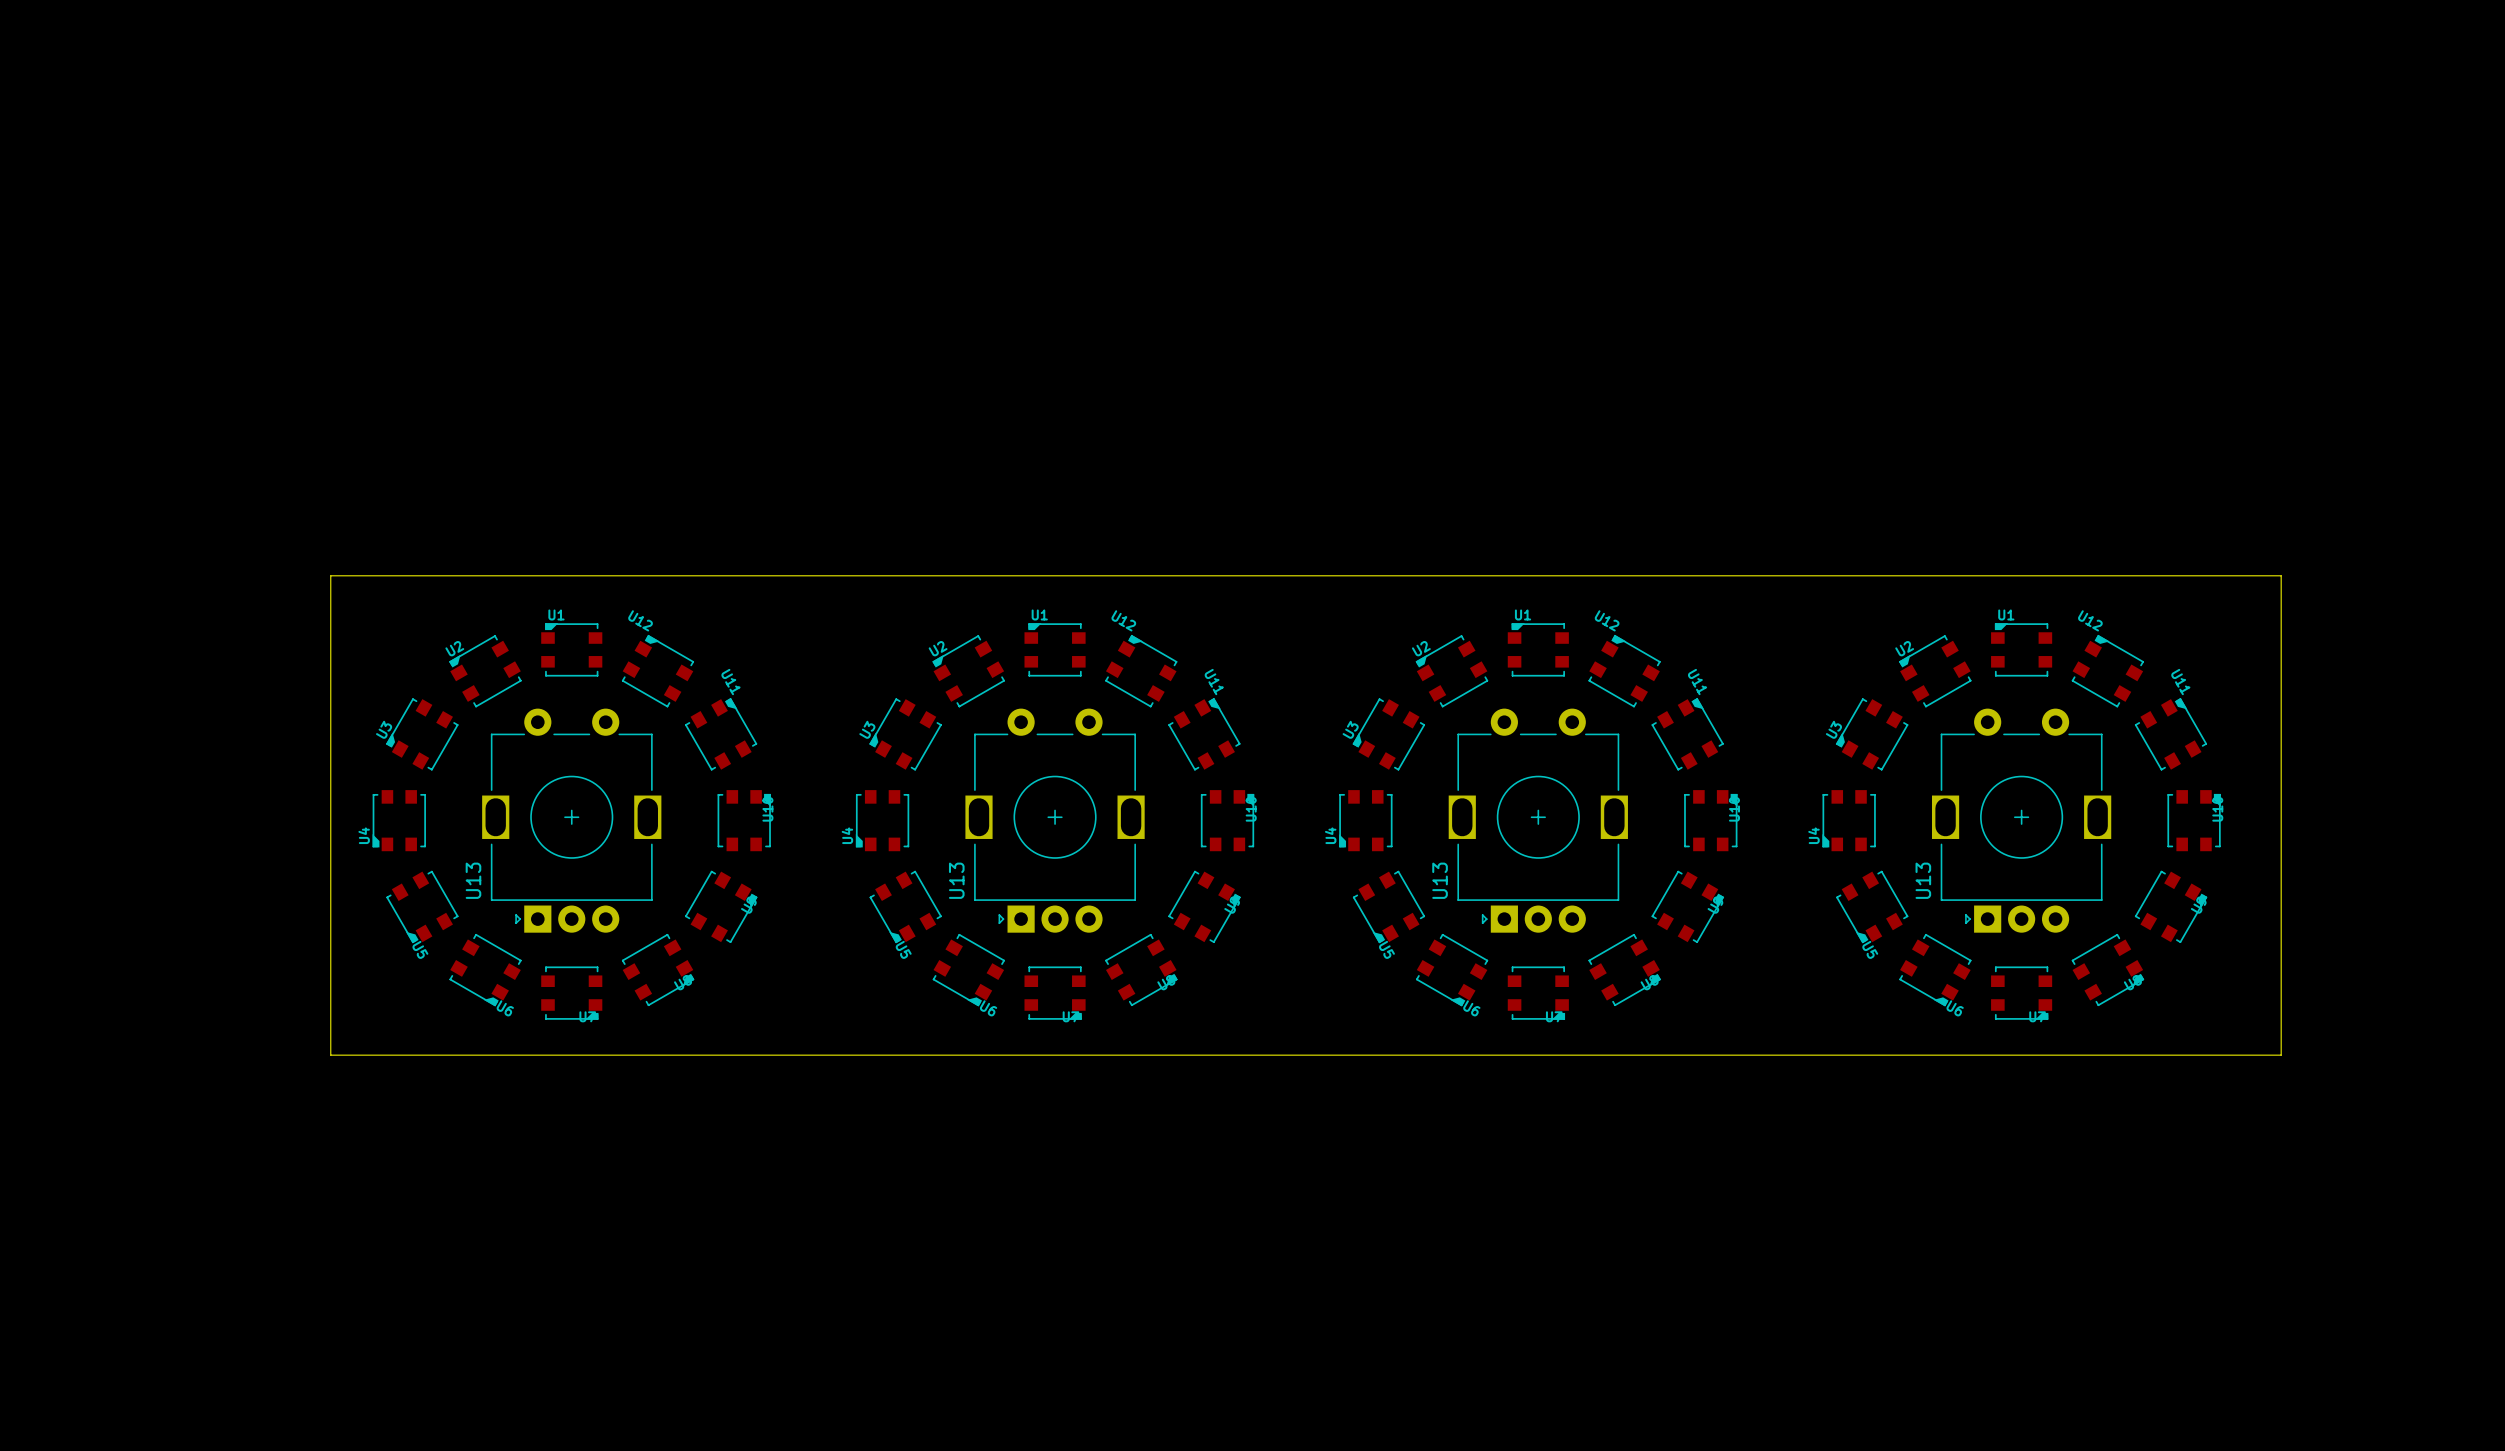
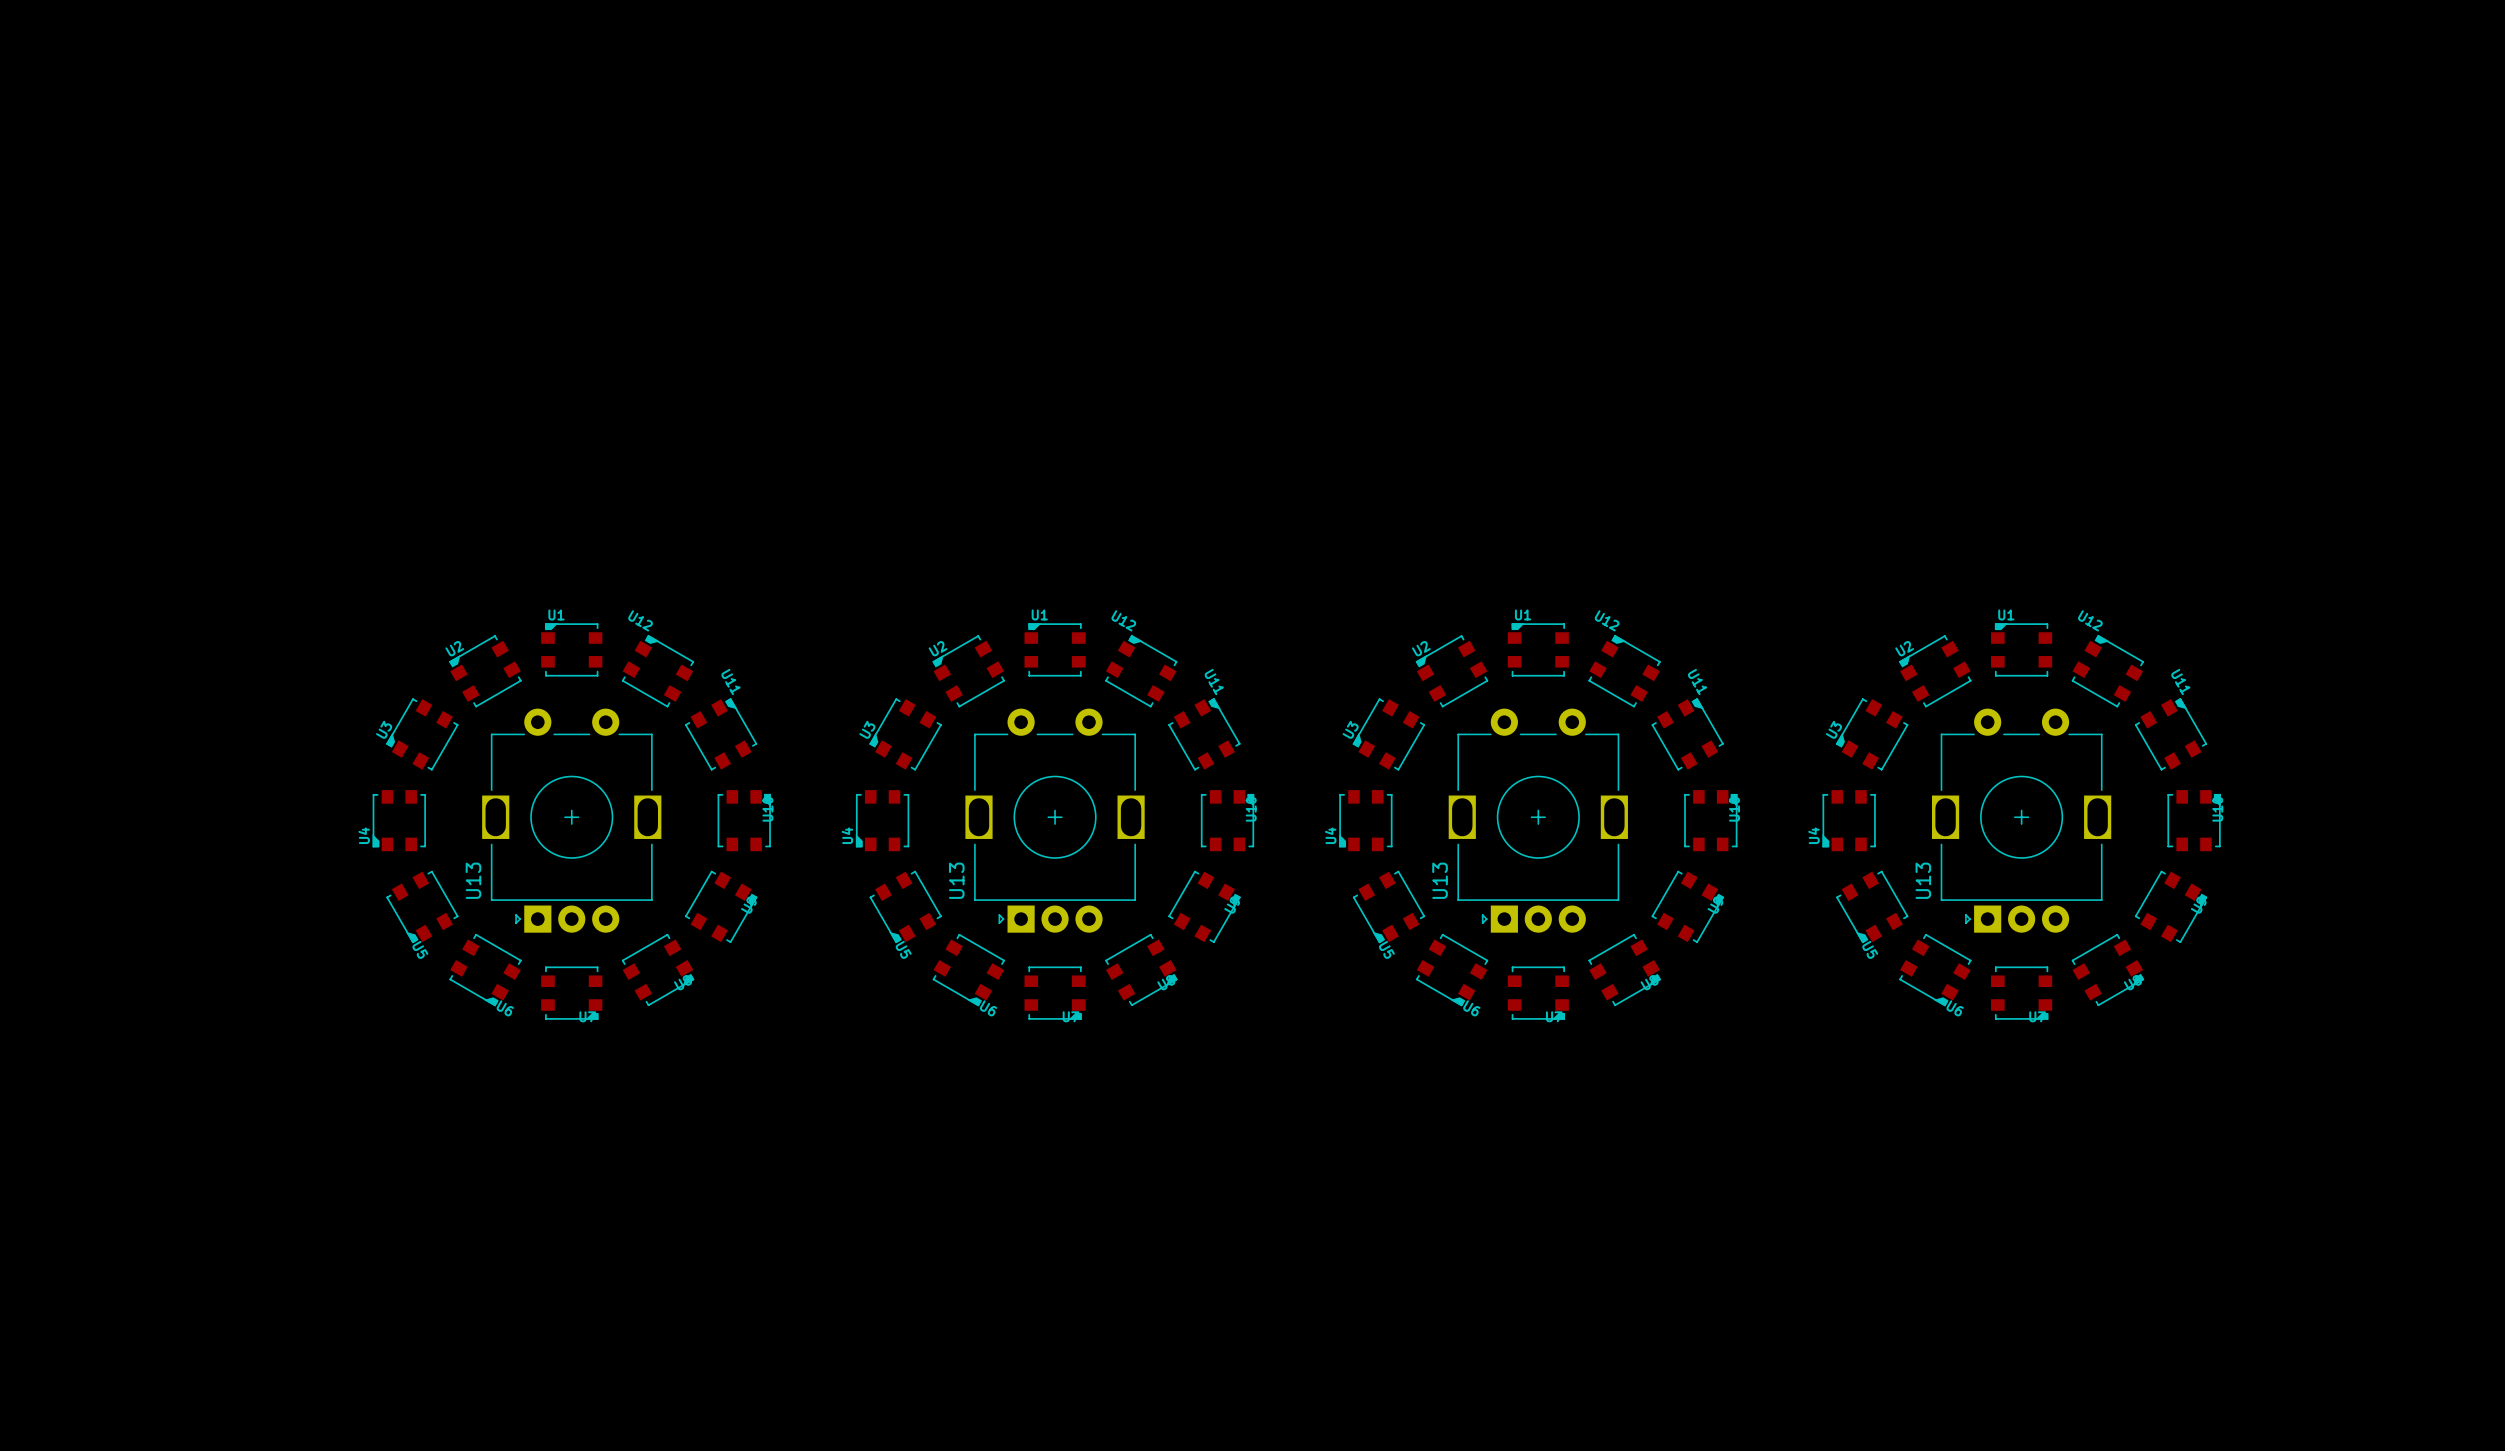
board edge: (330, 575) (2281, 575) (2281, 1055) (330, 1055) (330, 575) -> none

